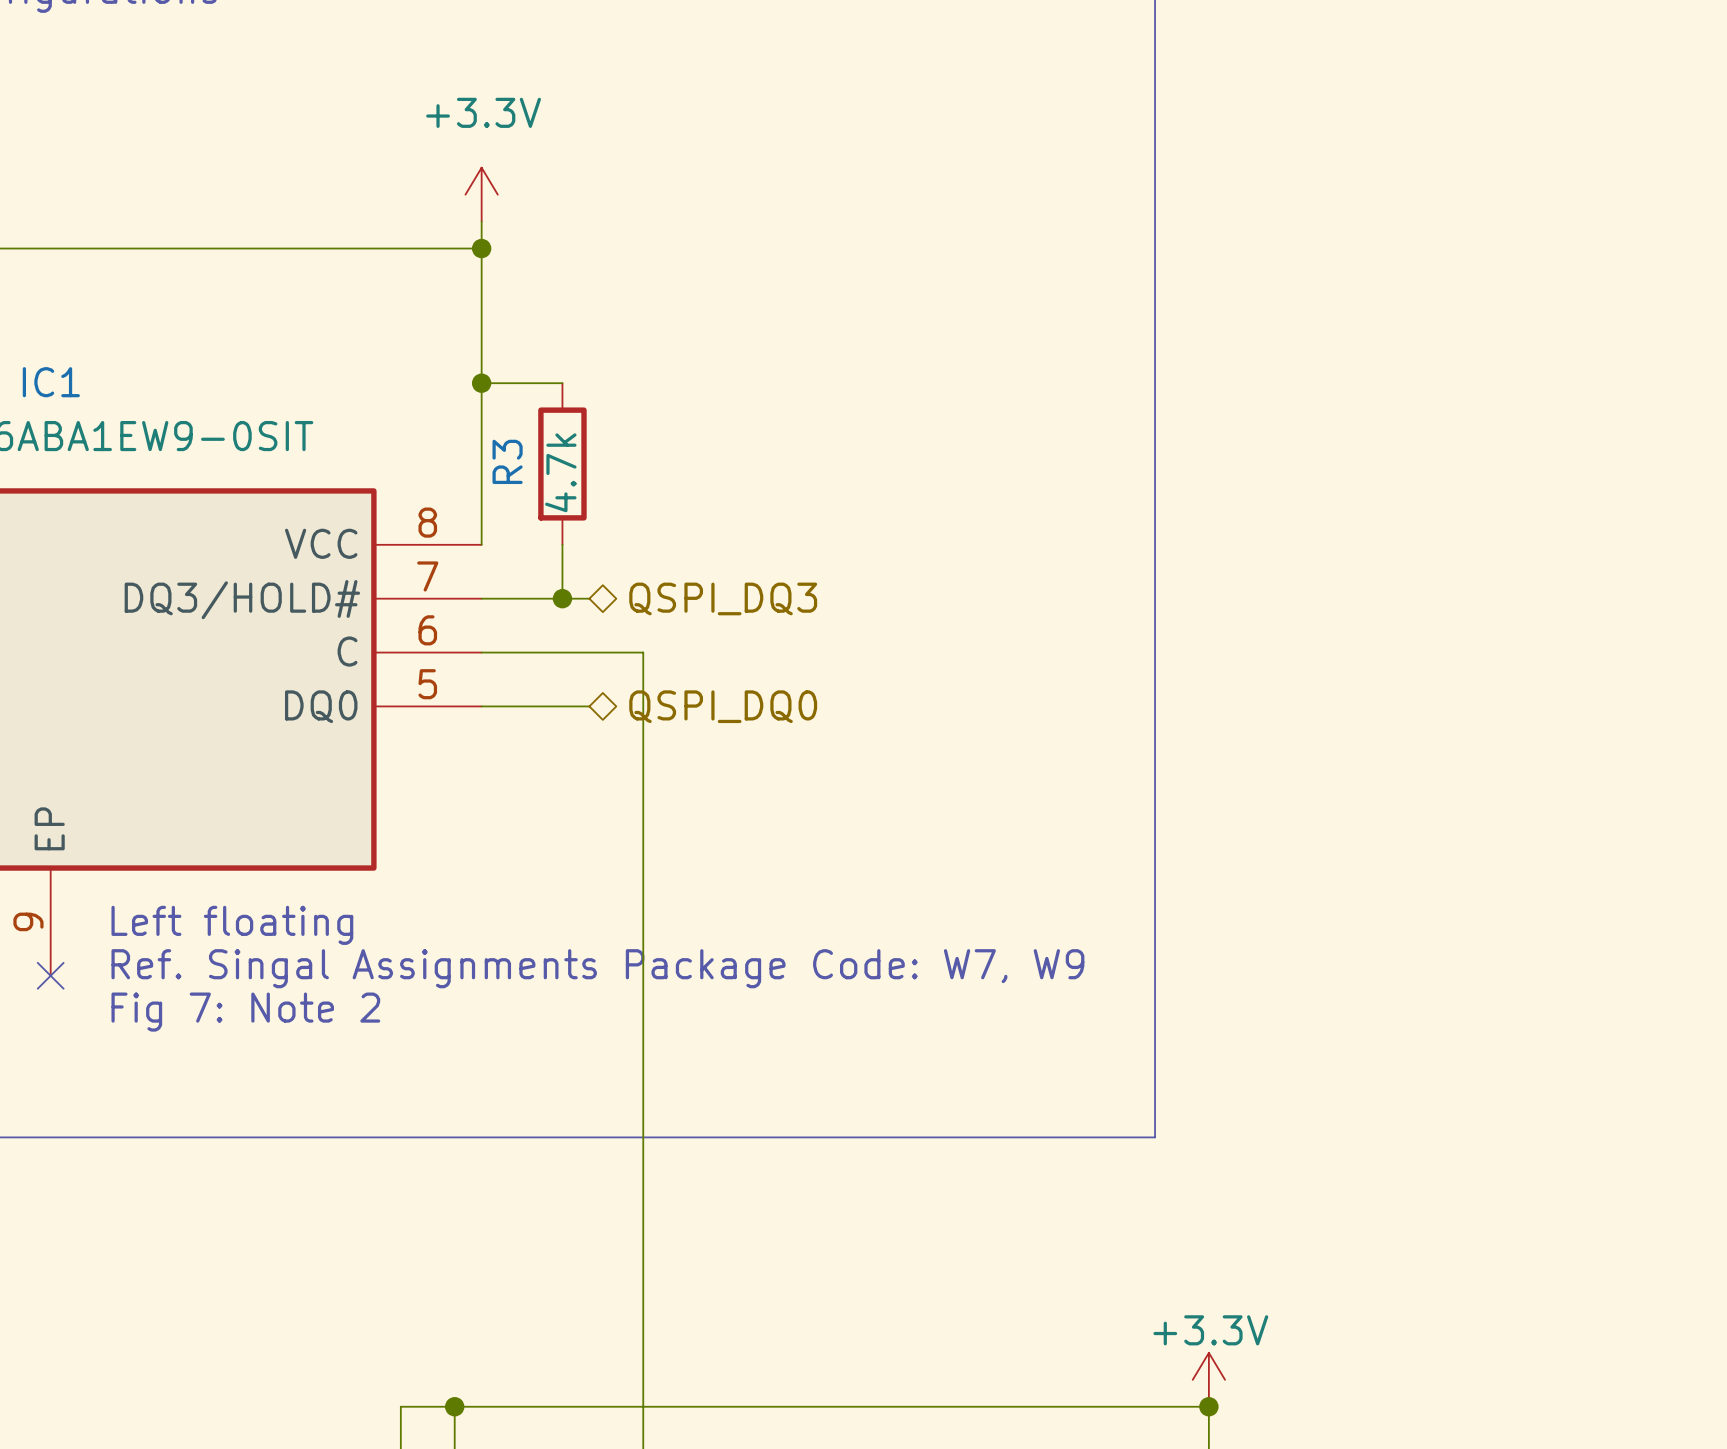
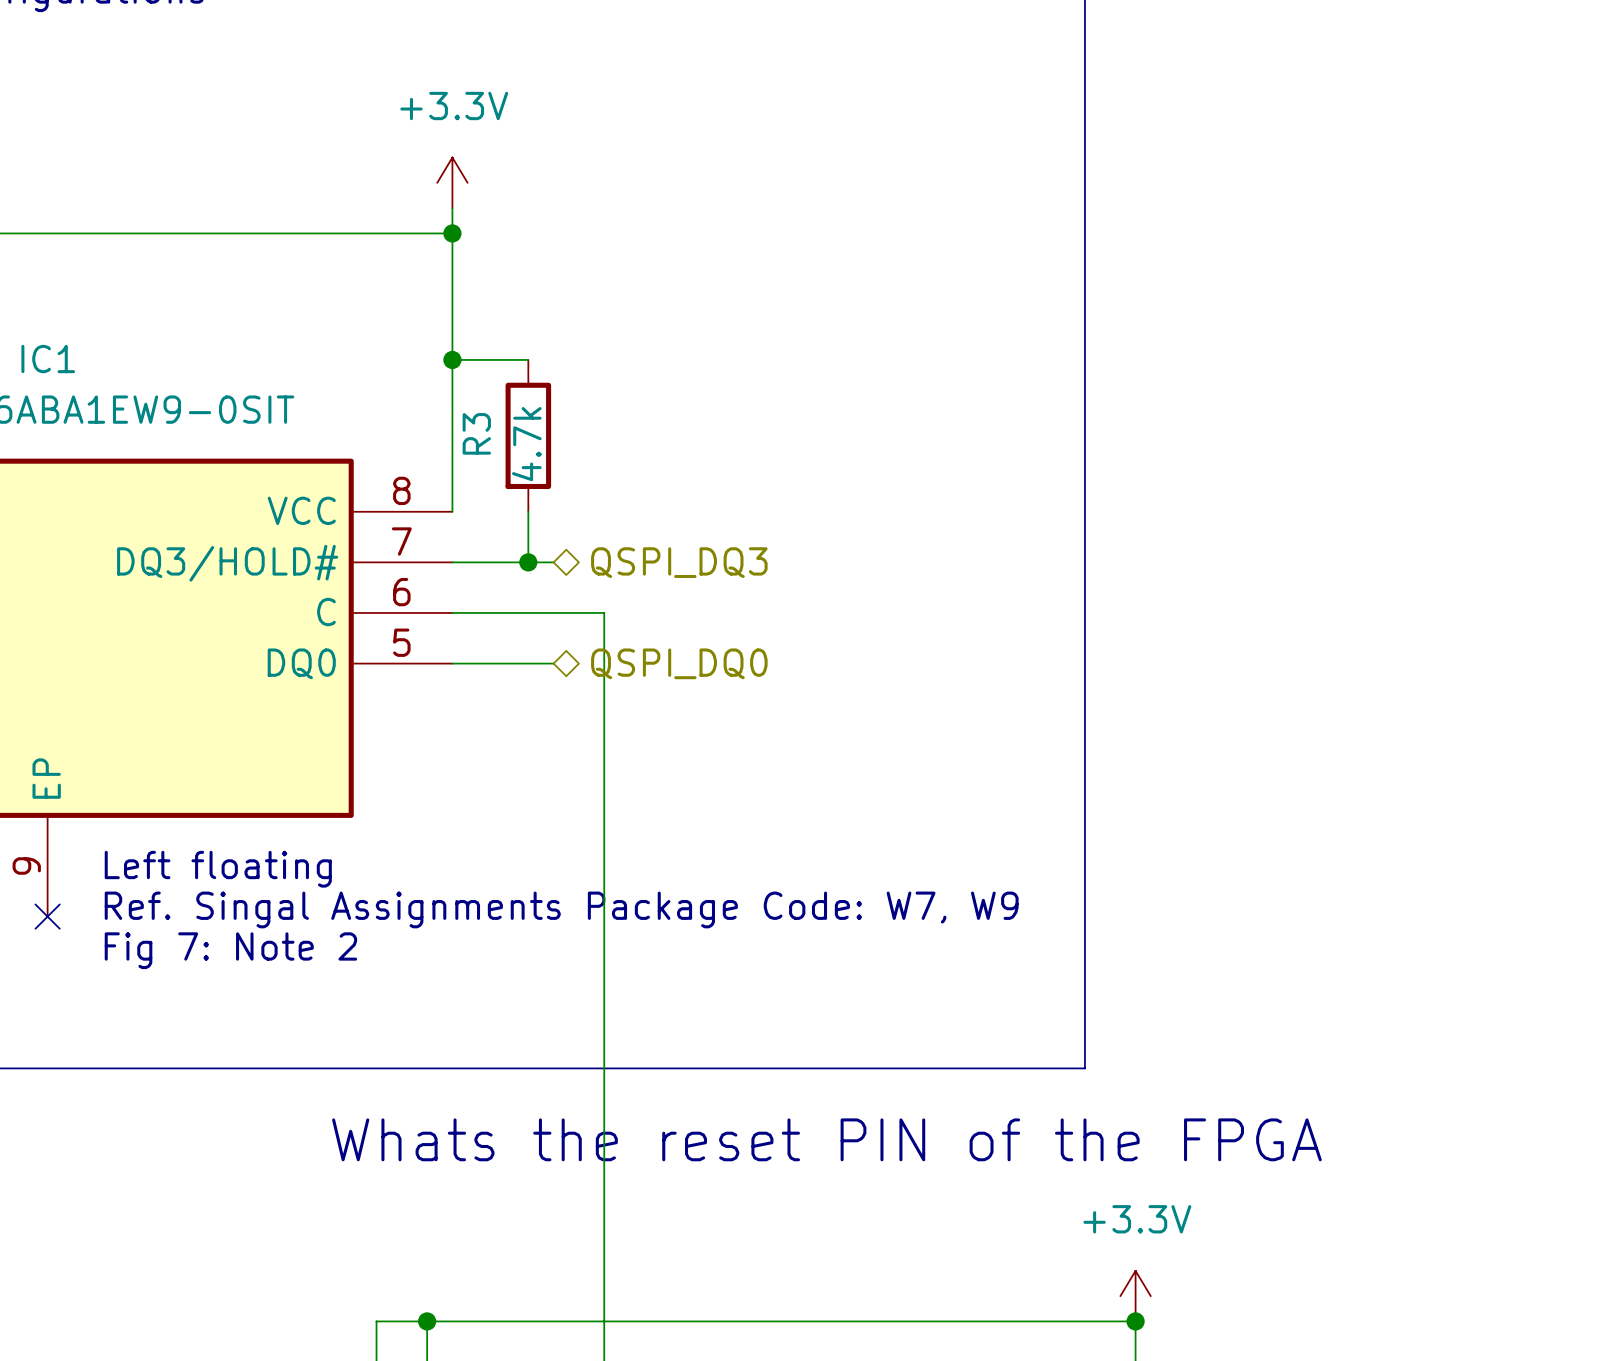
text: none -> Whats the reset PIN of the FPGA (826, 1139)
power symbol text position: +3.3V (1210, 1330) -> +3.3V (1137, 1219)

